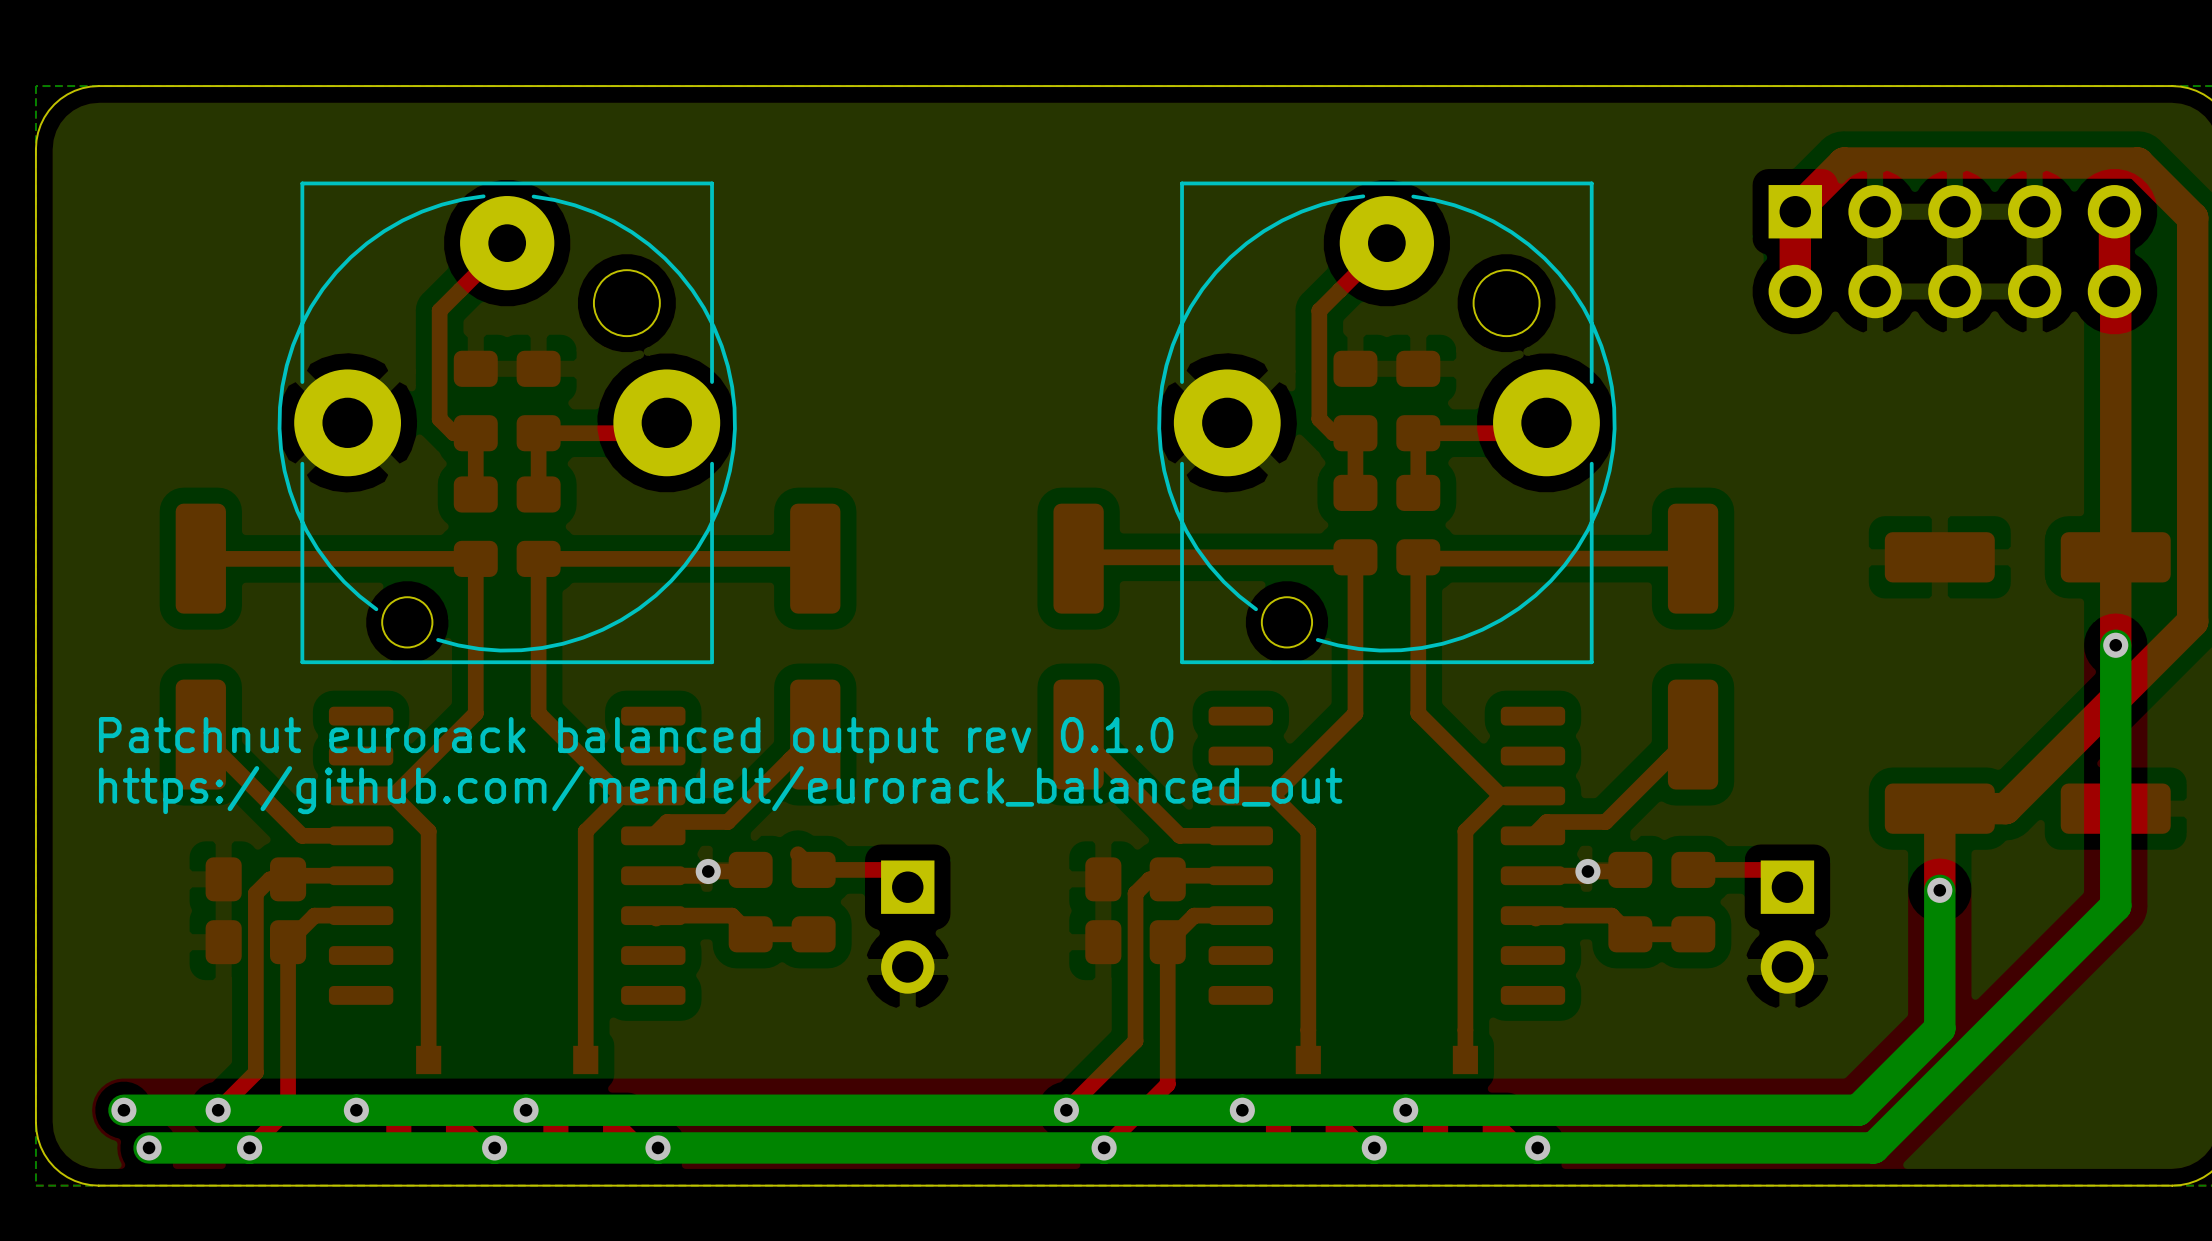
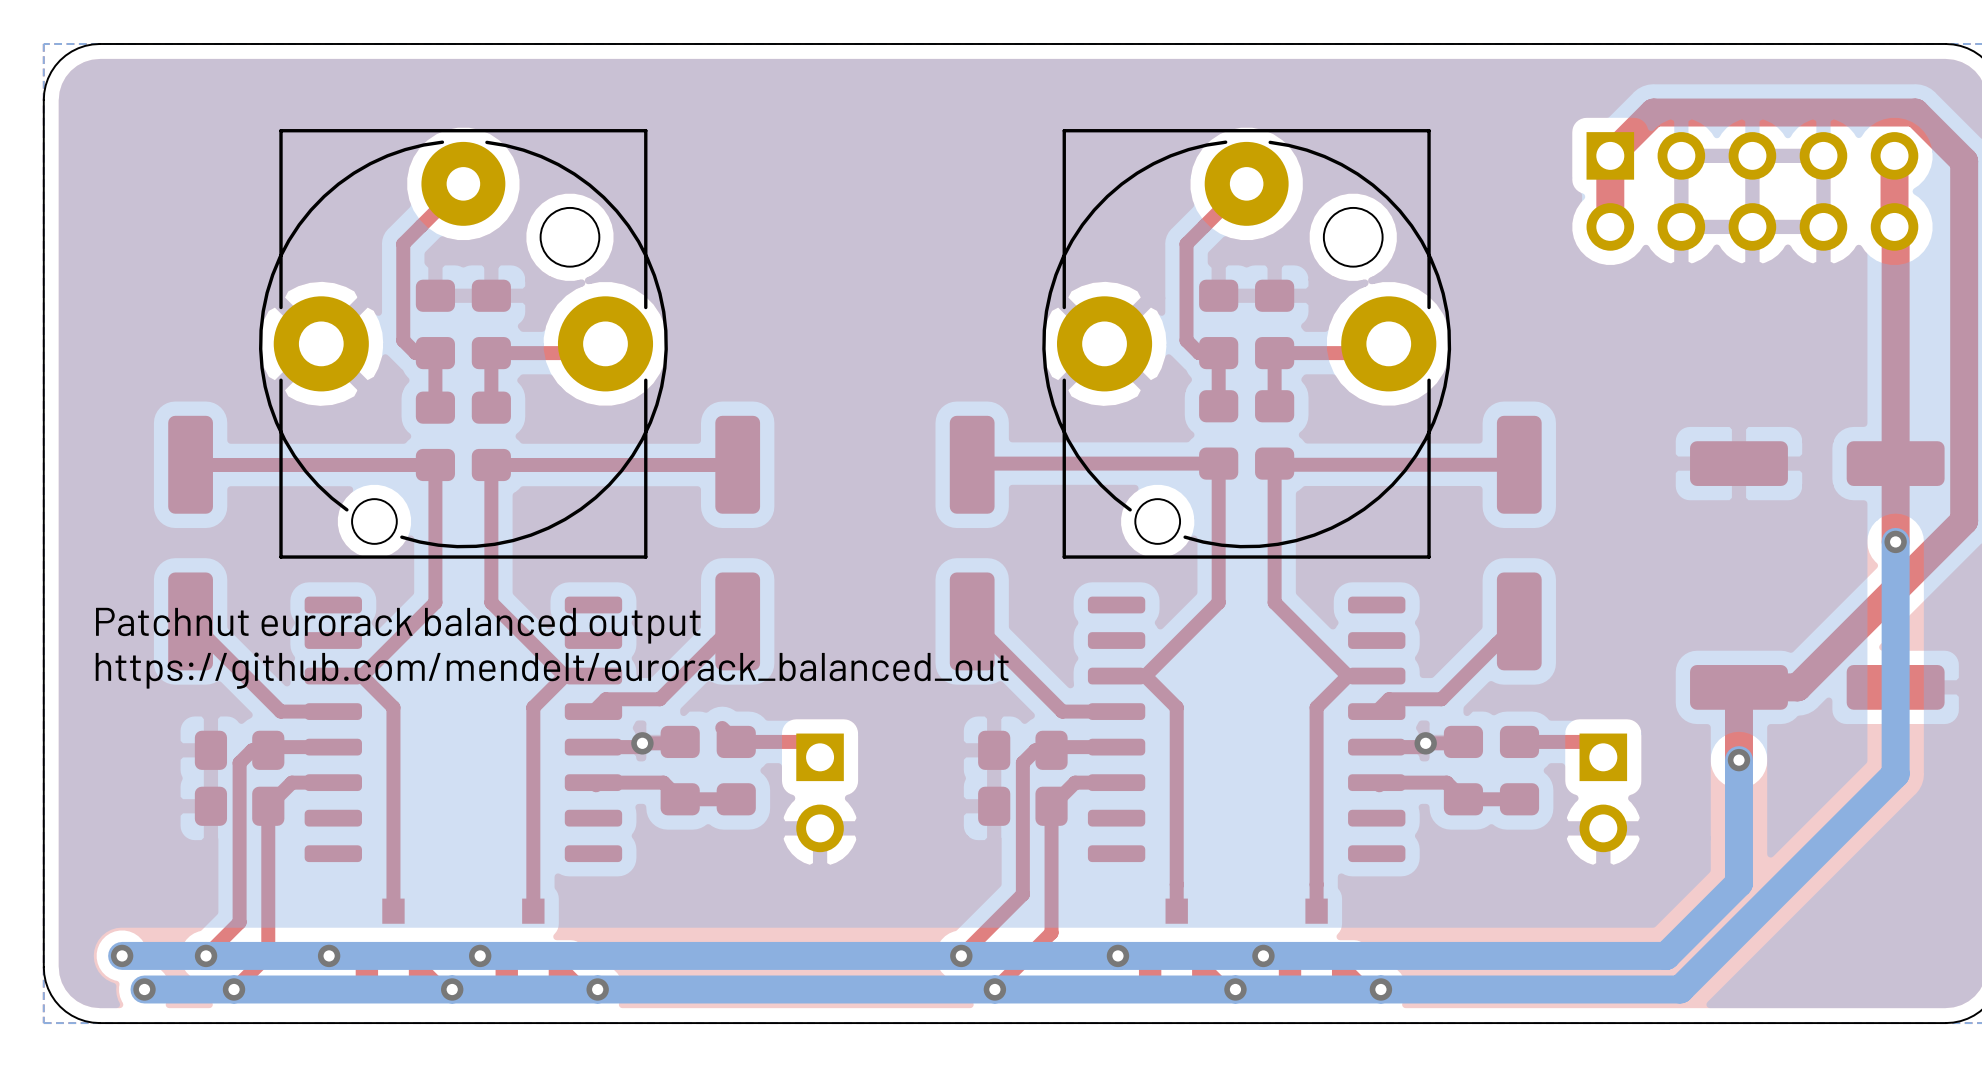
text: Patchnut eurorack balanced output rev 0.1.0 (636, 740) -> Patchnut eurorack balanced output (398, 625)

